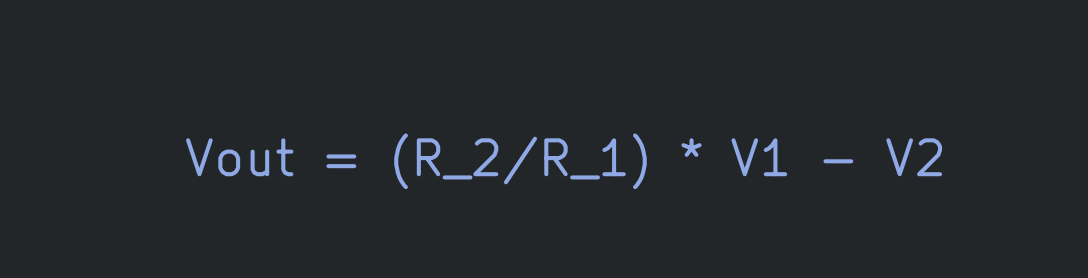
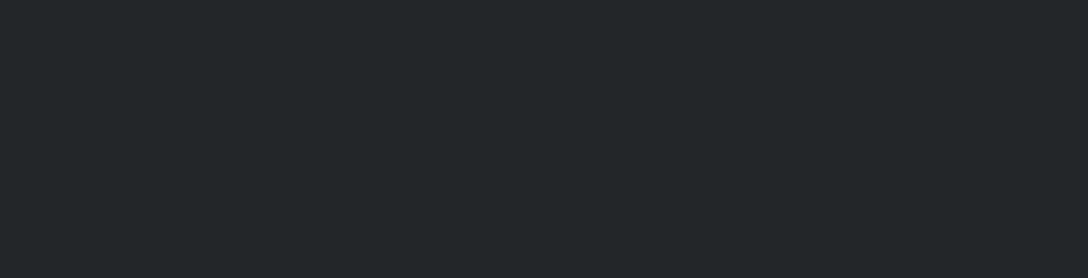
text: Vout = (R_2/R_1) * V1 - V2 (564, 161) -> none

